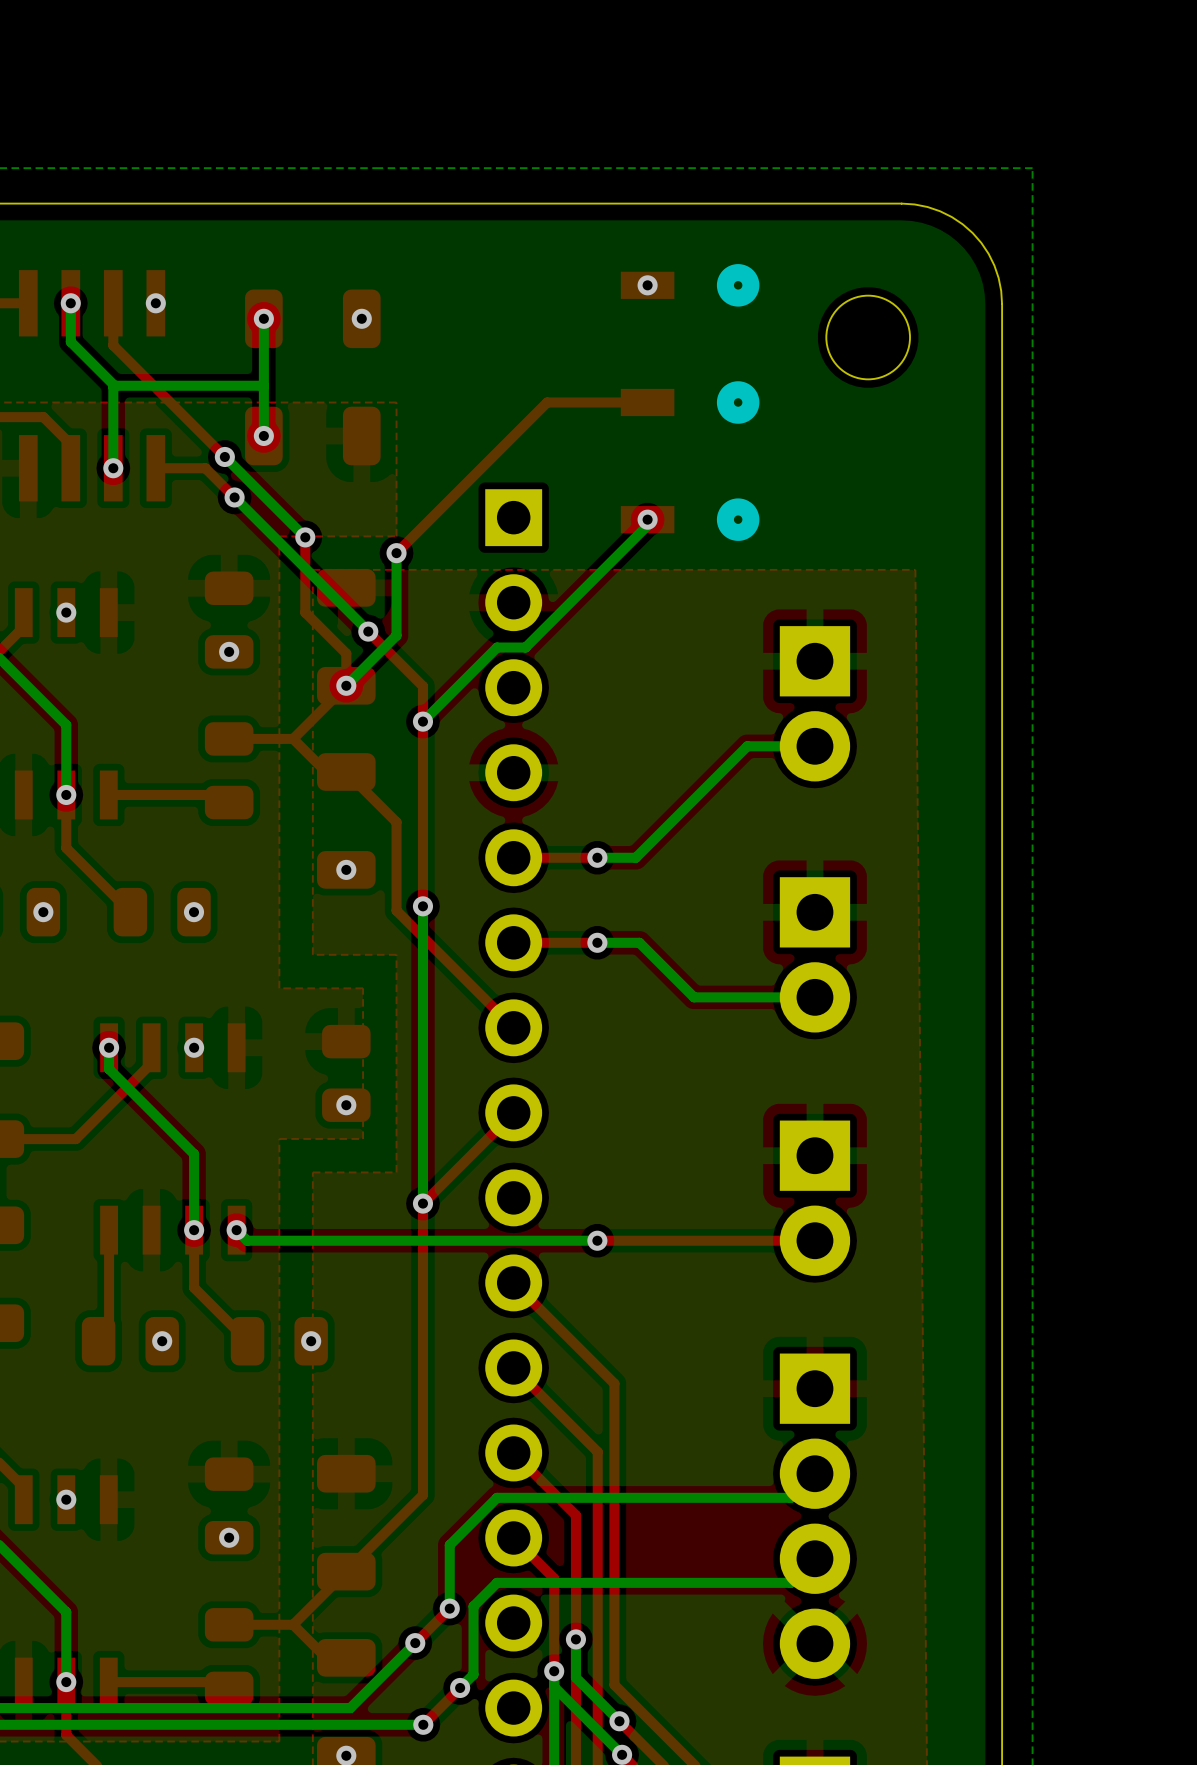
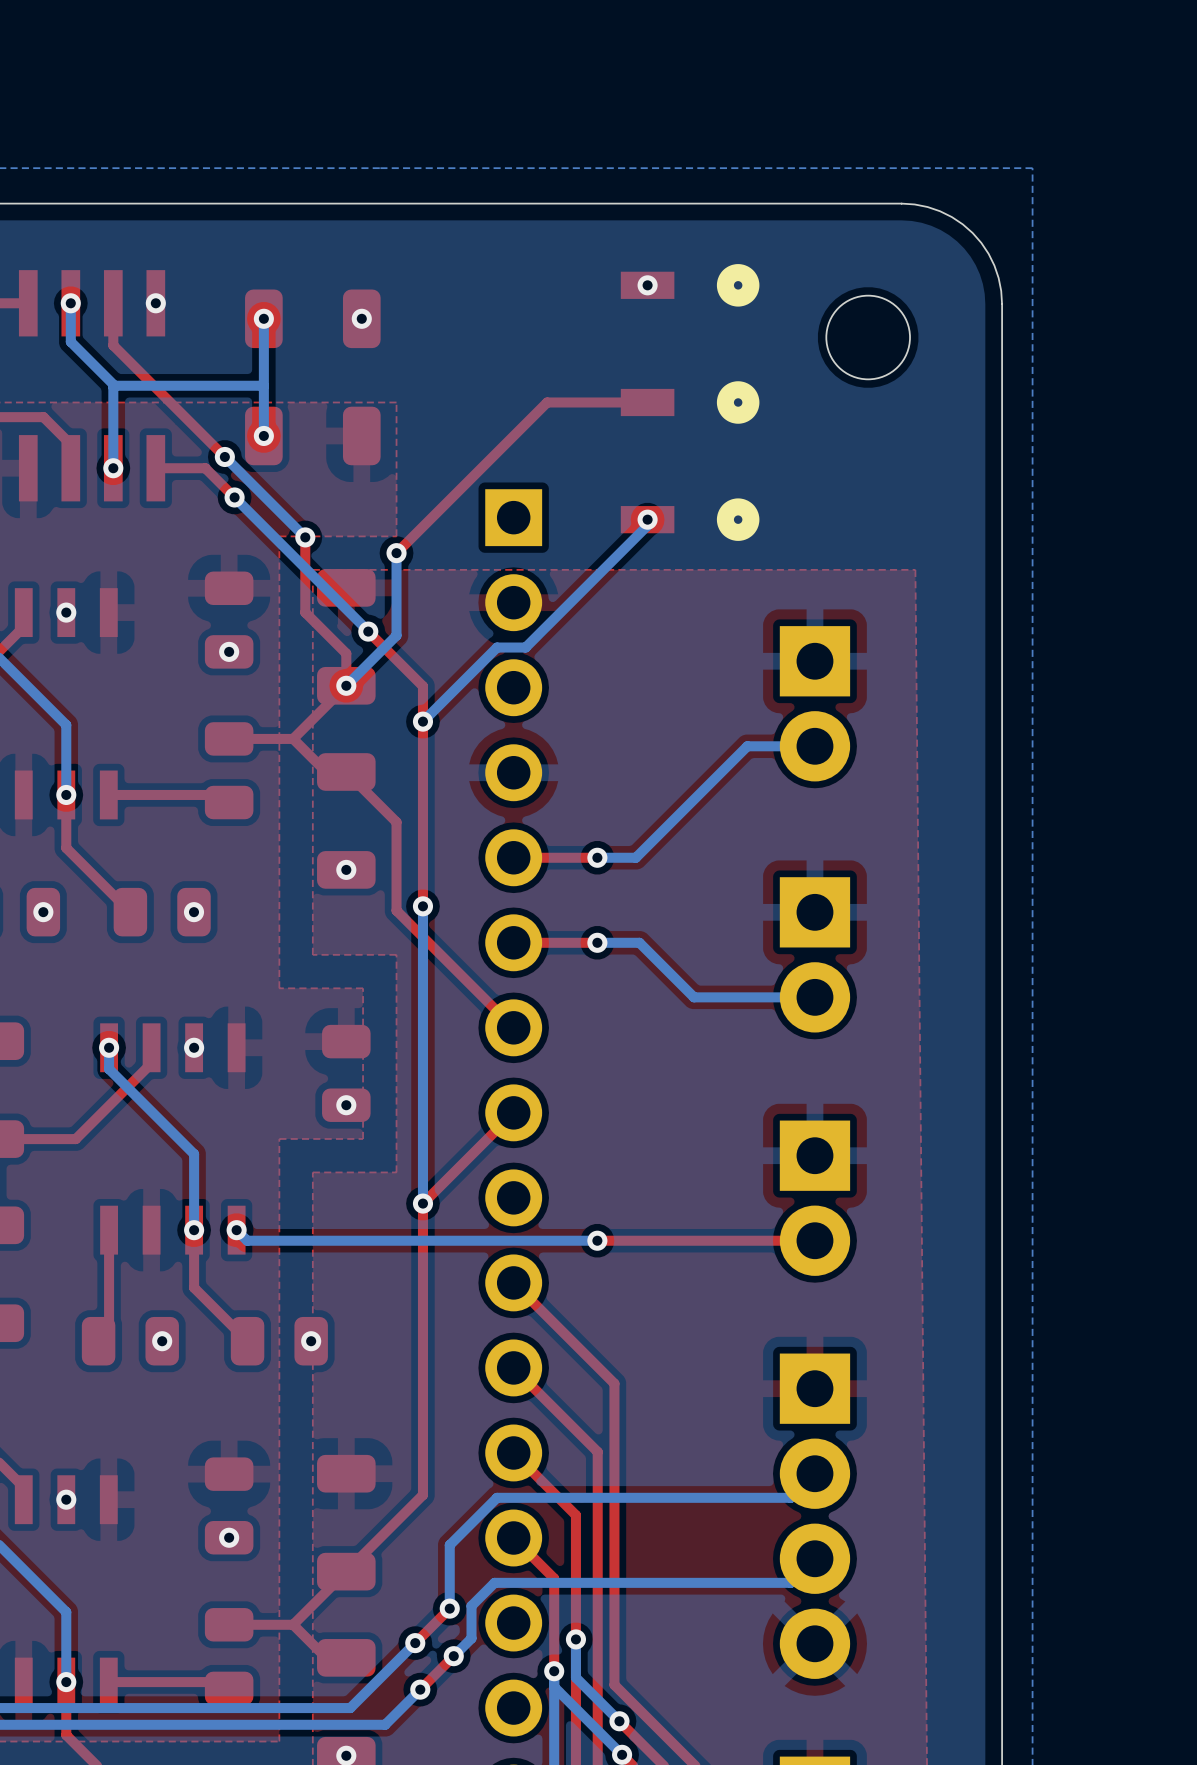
bottom track: (497, 1582) (473, 1606) (473, 1674) (460, 1687) -> (497, 1582) (494, 1582) (471, 1605) (471, 1638) (453, 1656)
top track: none -> (453, 1656) (420, 1689)
via: none -> (453, 1656)
top track: (460, 1687) (423, 1724) -> none
via: (460, 1687) -> none
via: none -> (420, 1689)
bottom track: (423, 1724) (385, 1724) -> (420, 1689) (385, 1724)
via: (423, 1724) -> none

